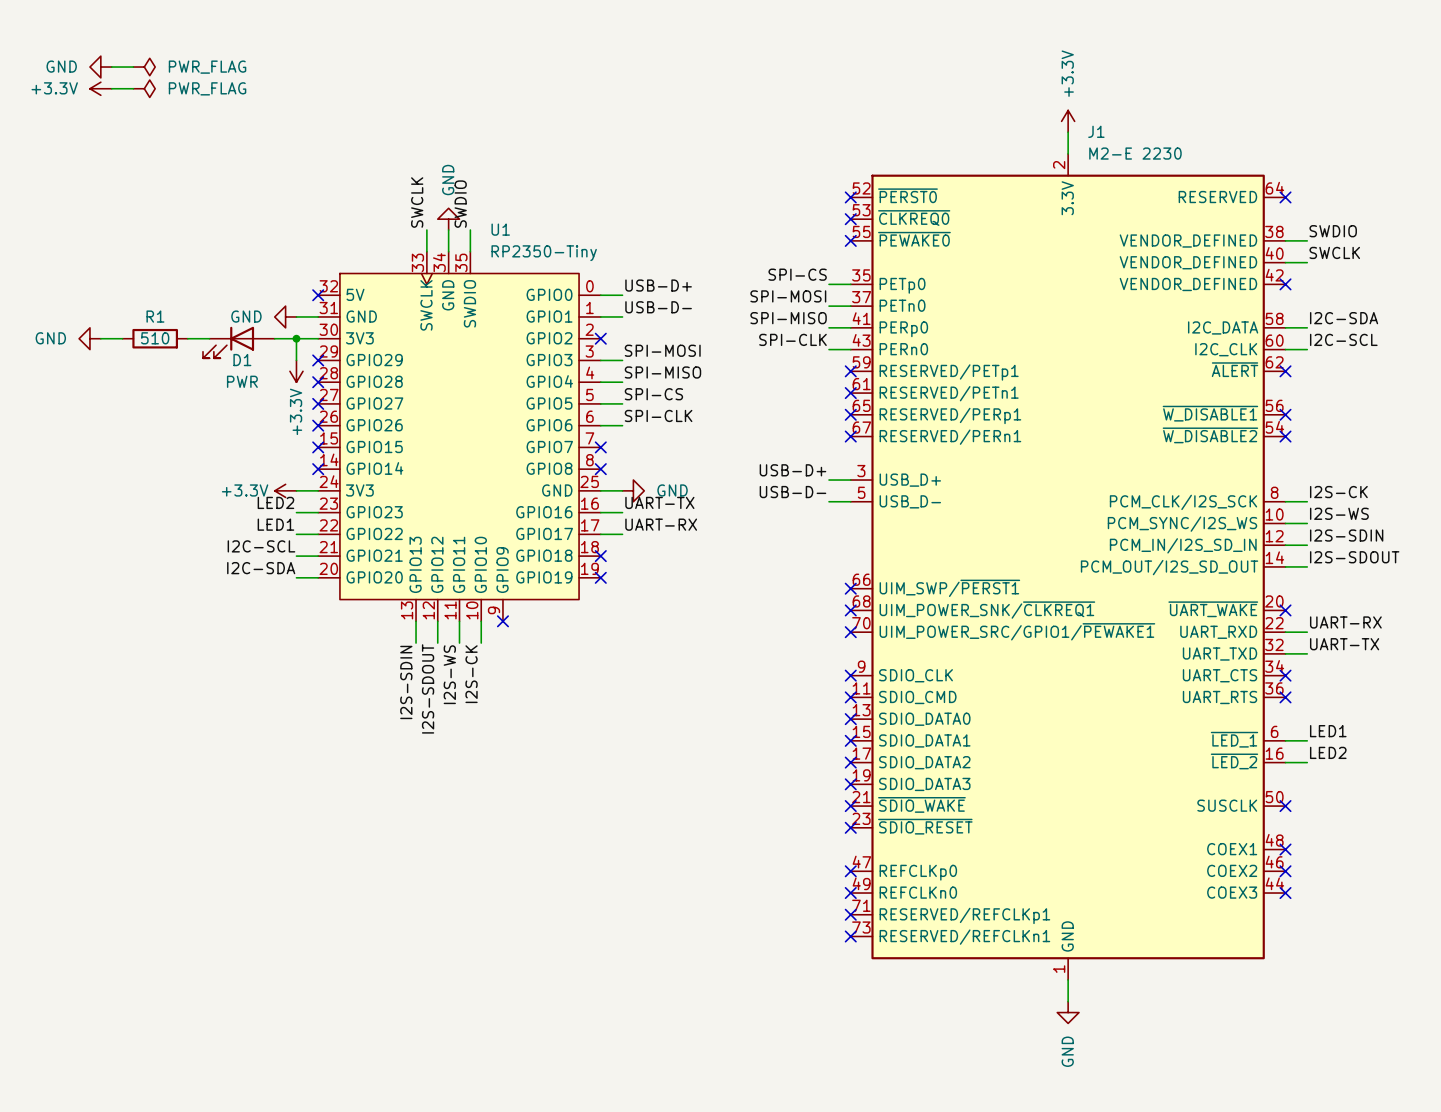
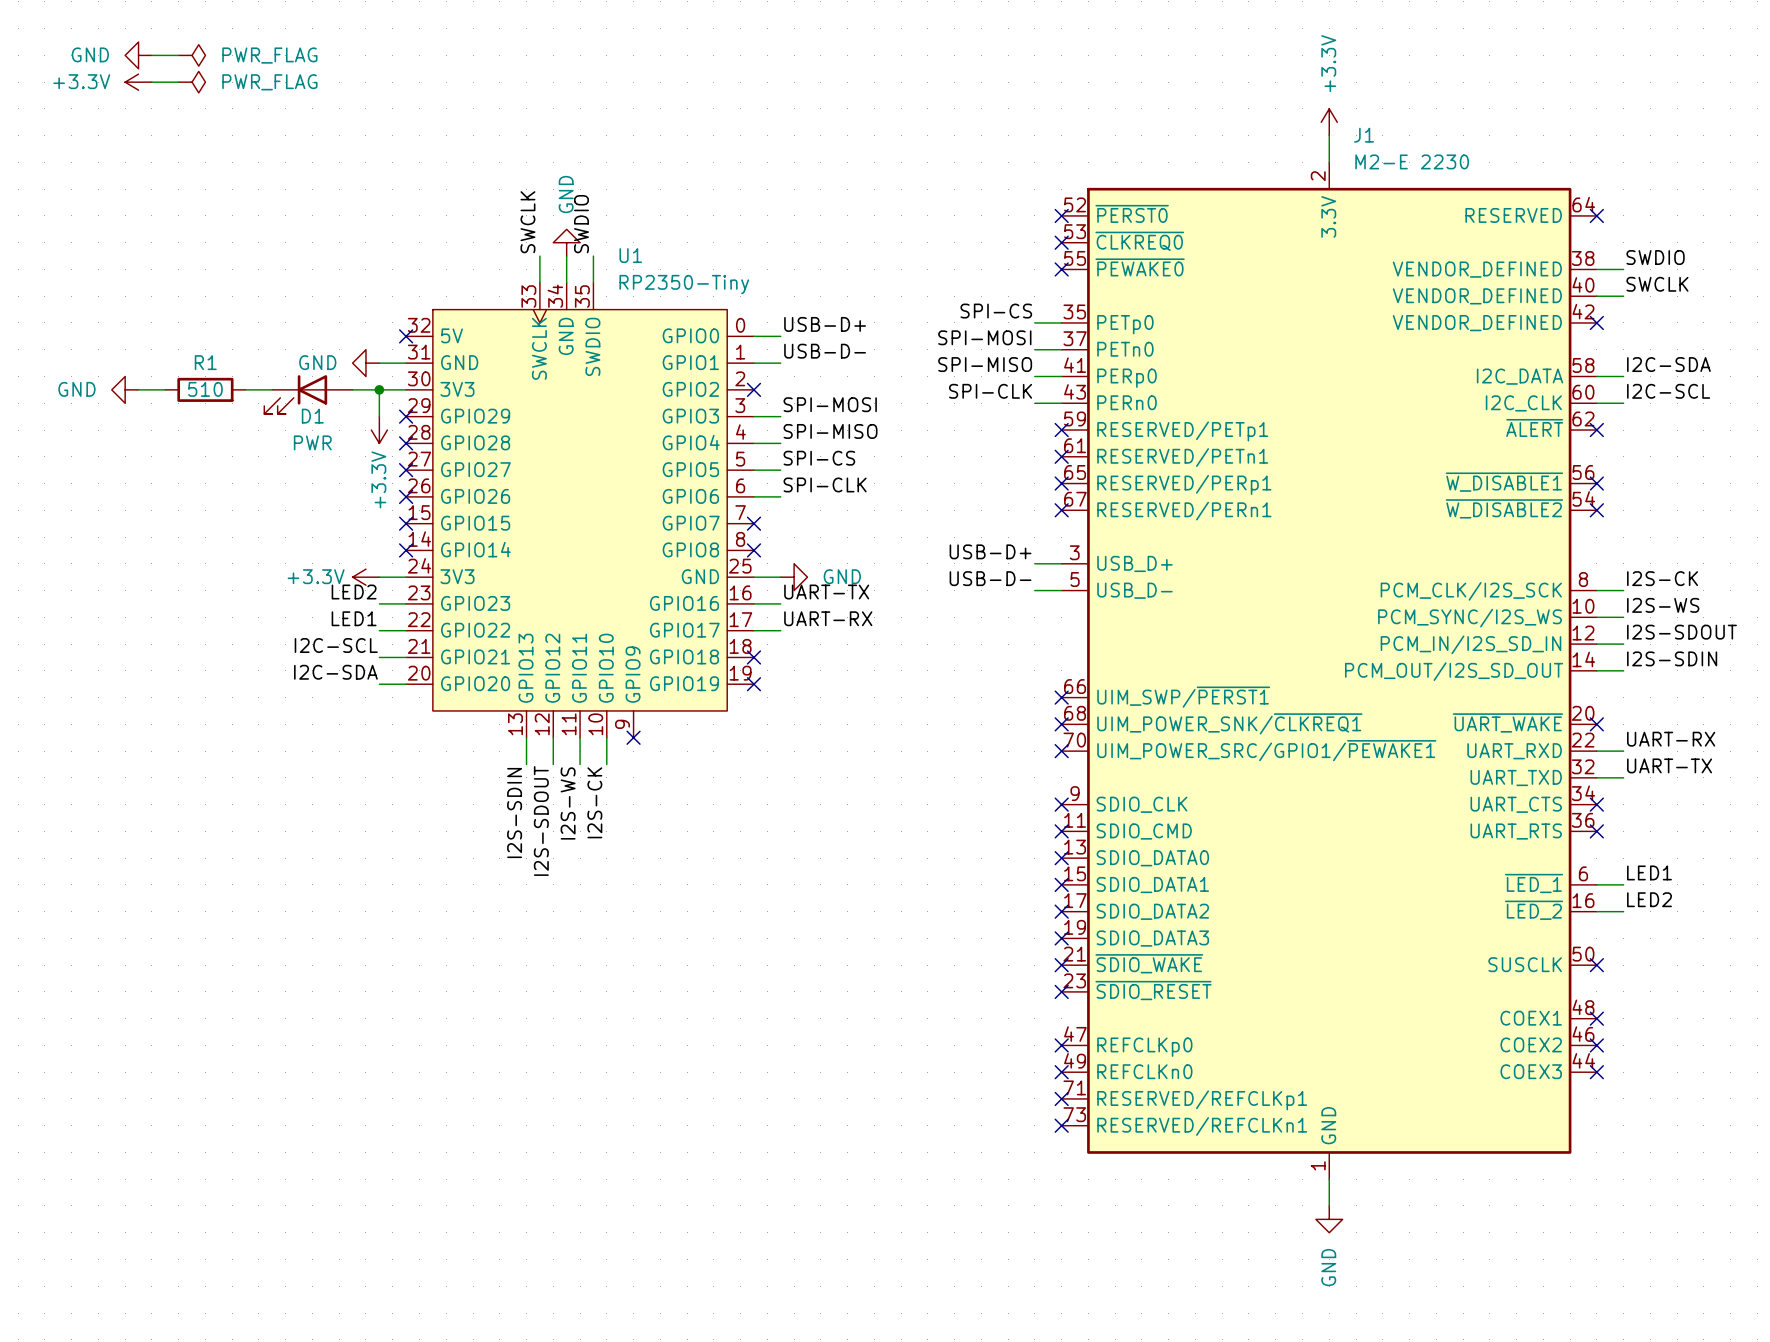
label: I2S-SDIN (1346, 535) -> I2S-SDOUT (1681, 632)
label: I2S-SDOUT (1354, 557) -> I2S-SDIN (1672, 658)

